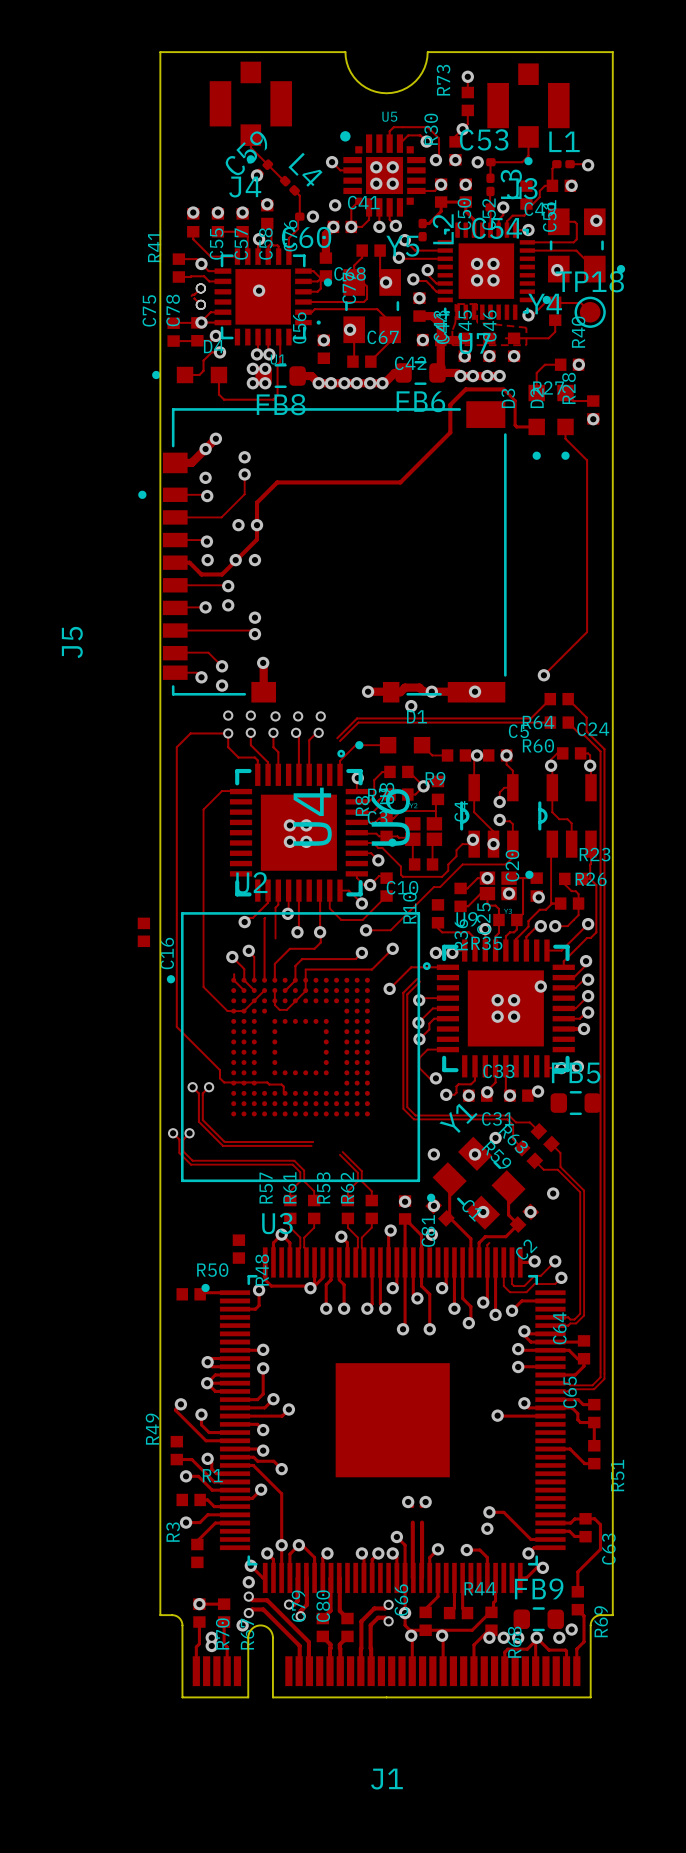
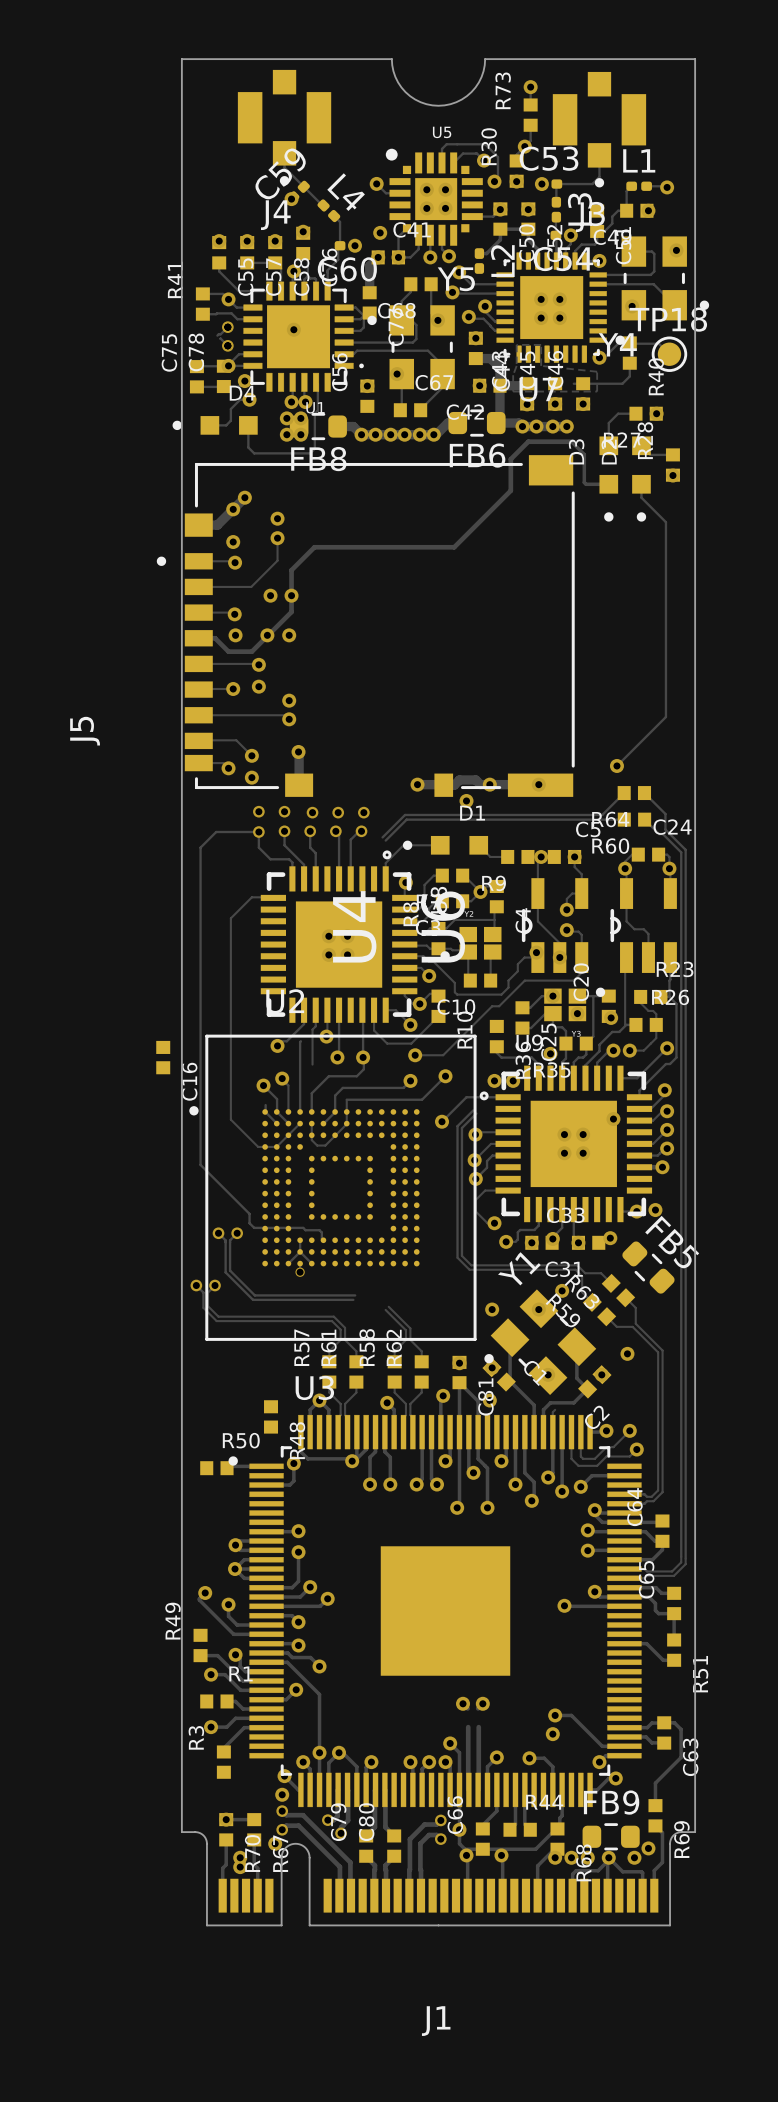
via: none -> (227, 327)
via: none -> (227, 345)
track: none -> (300, 1240) (300, 1251)
track: none -> (300, 1251) (311, 1263)
track: none -> (300, 1251) (288, 1263)
FB5 rotation: 0° (575, 1103) -> 45° clockwise (648, 1267)
via: none -> (300, 1272)

